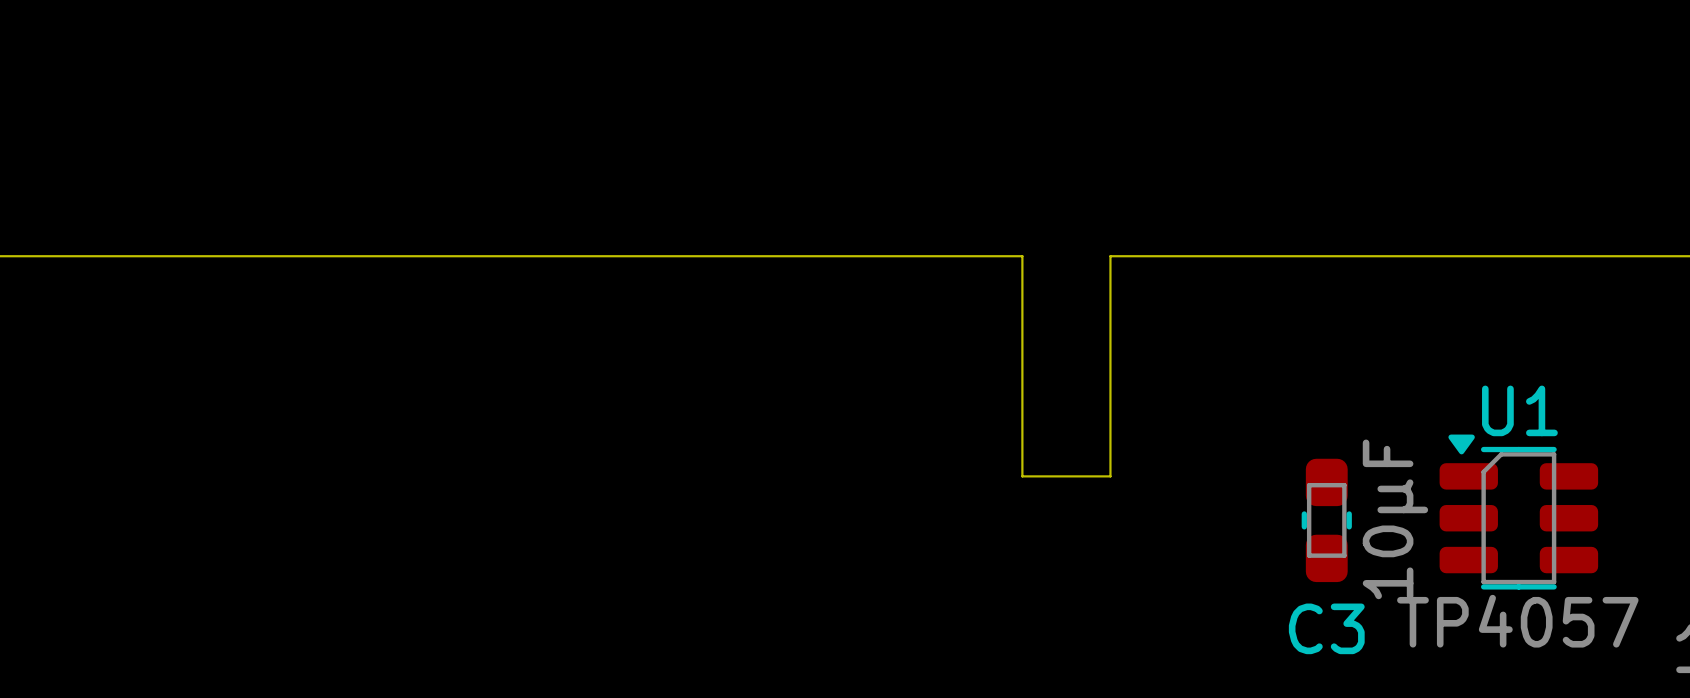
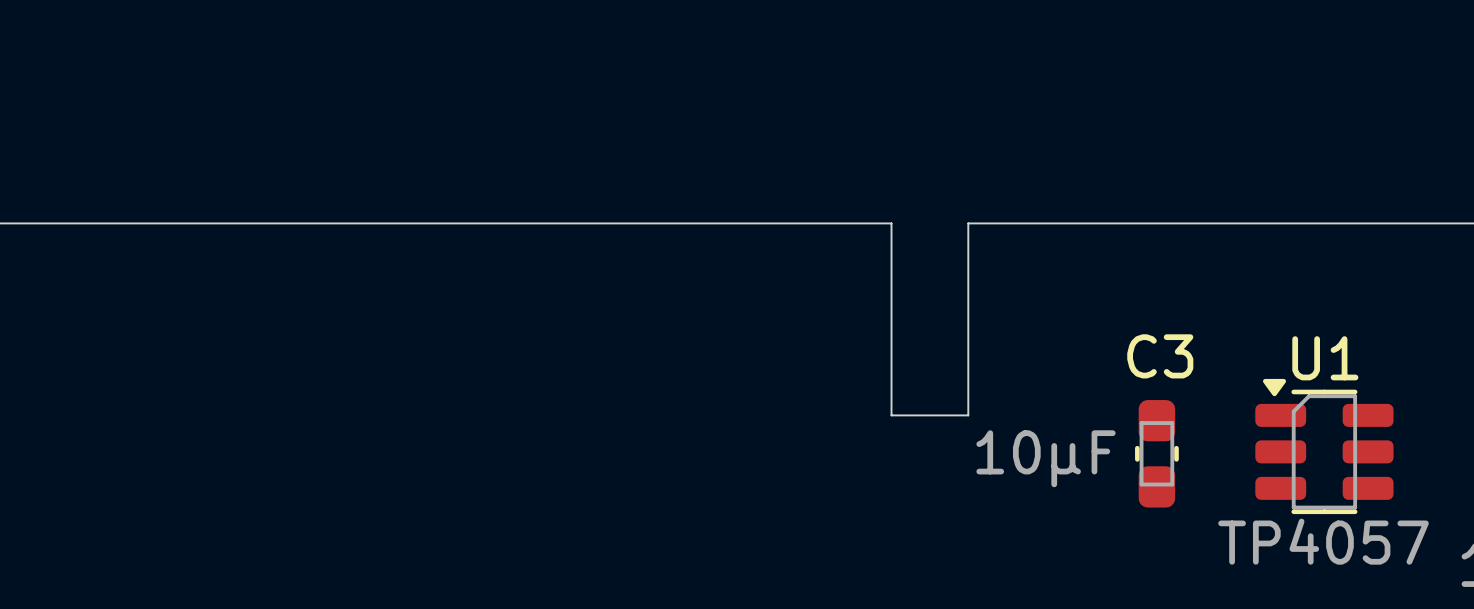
C3 value rotation: 0° (1395, 519) -> 90° clockwise (1046, 458)
C3 name position: C3 (1326, 628) -> C3 (1160, 356)

